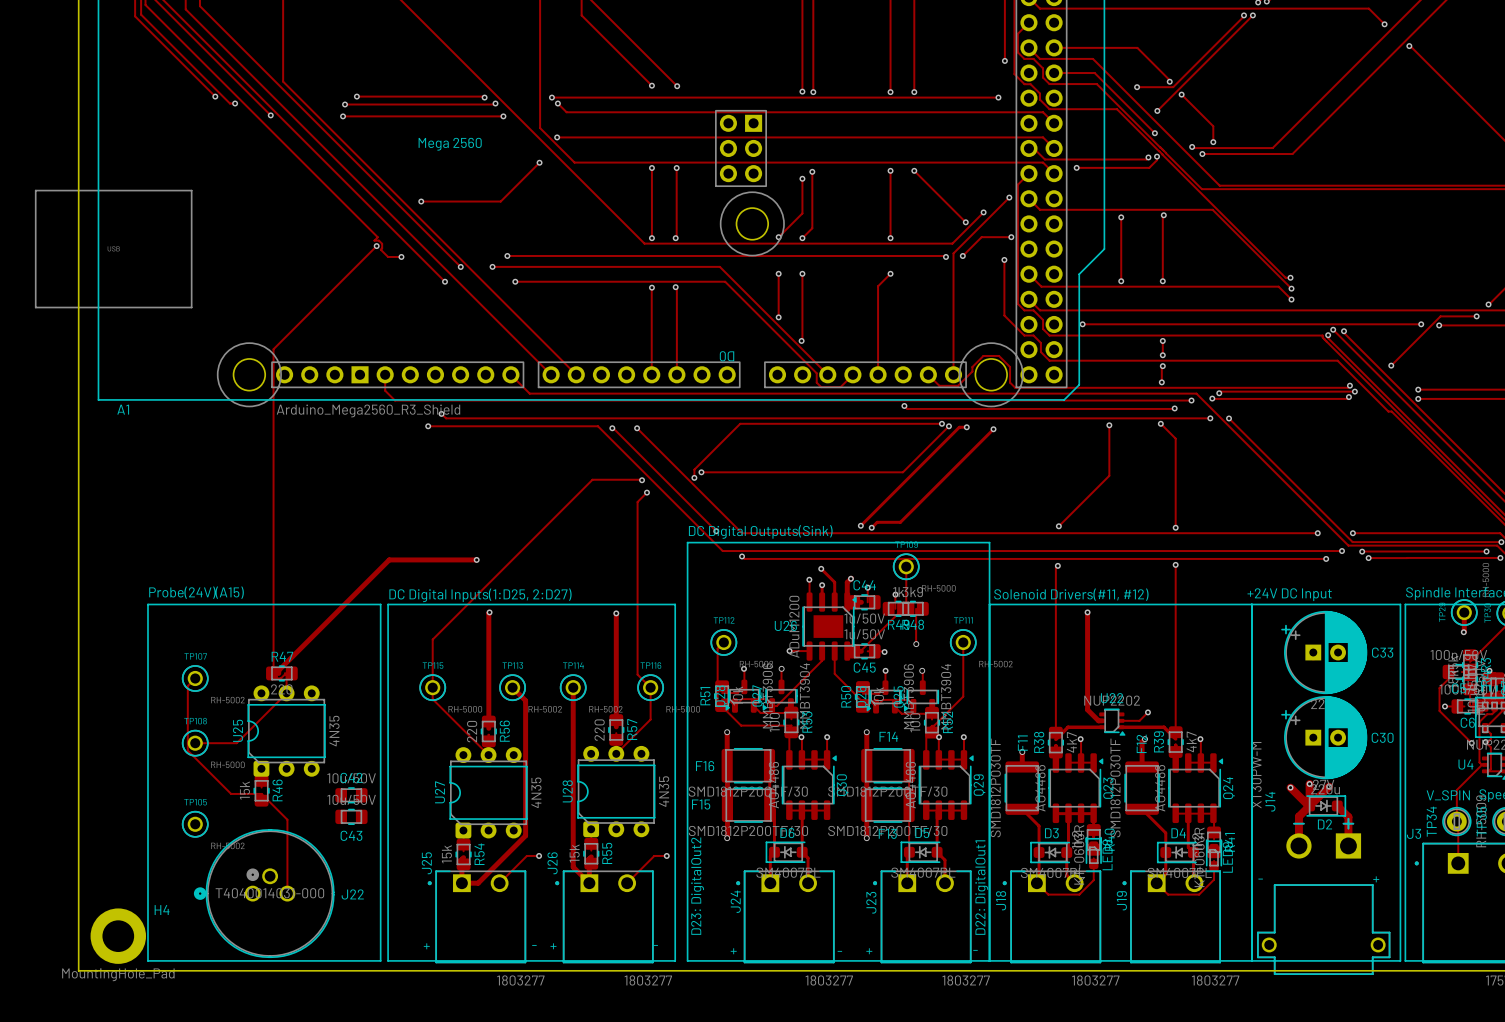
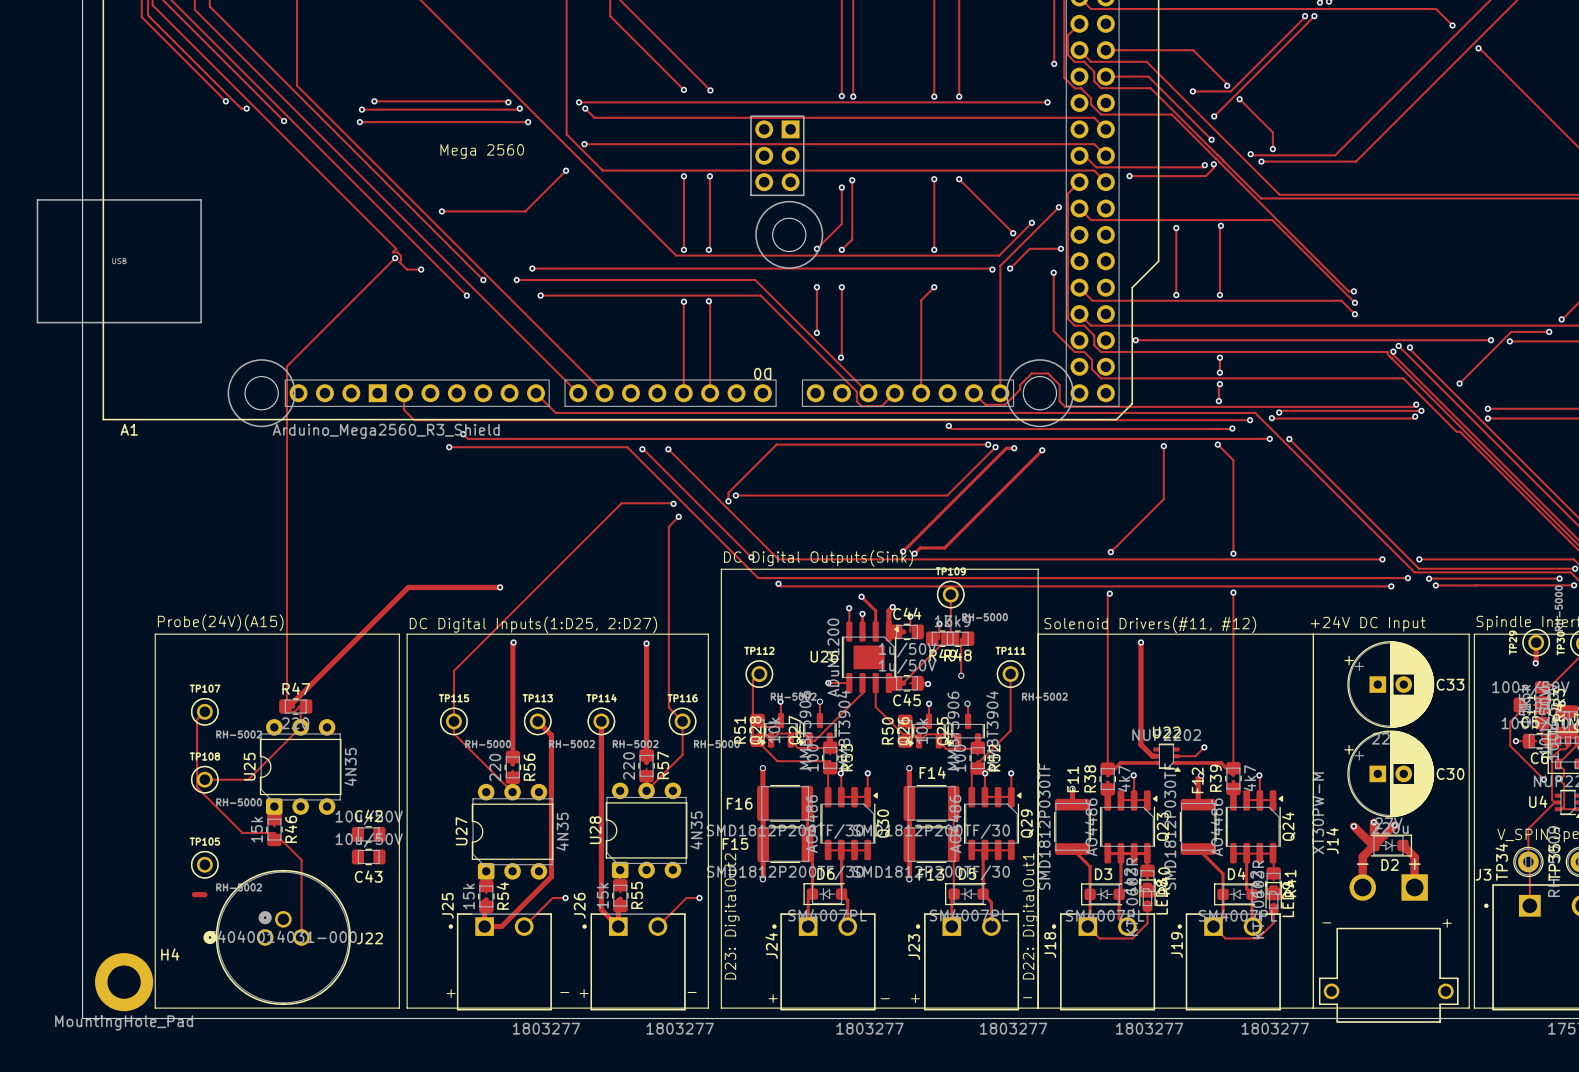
part: none -> (199, 894)

